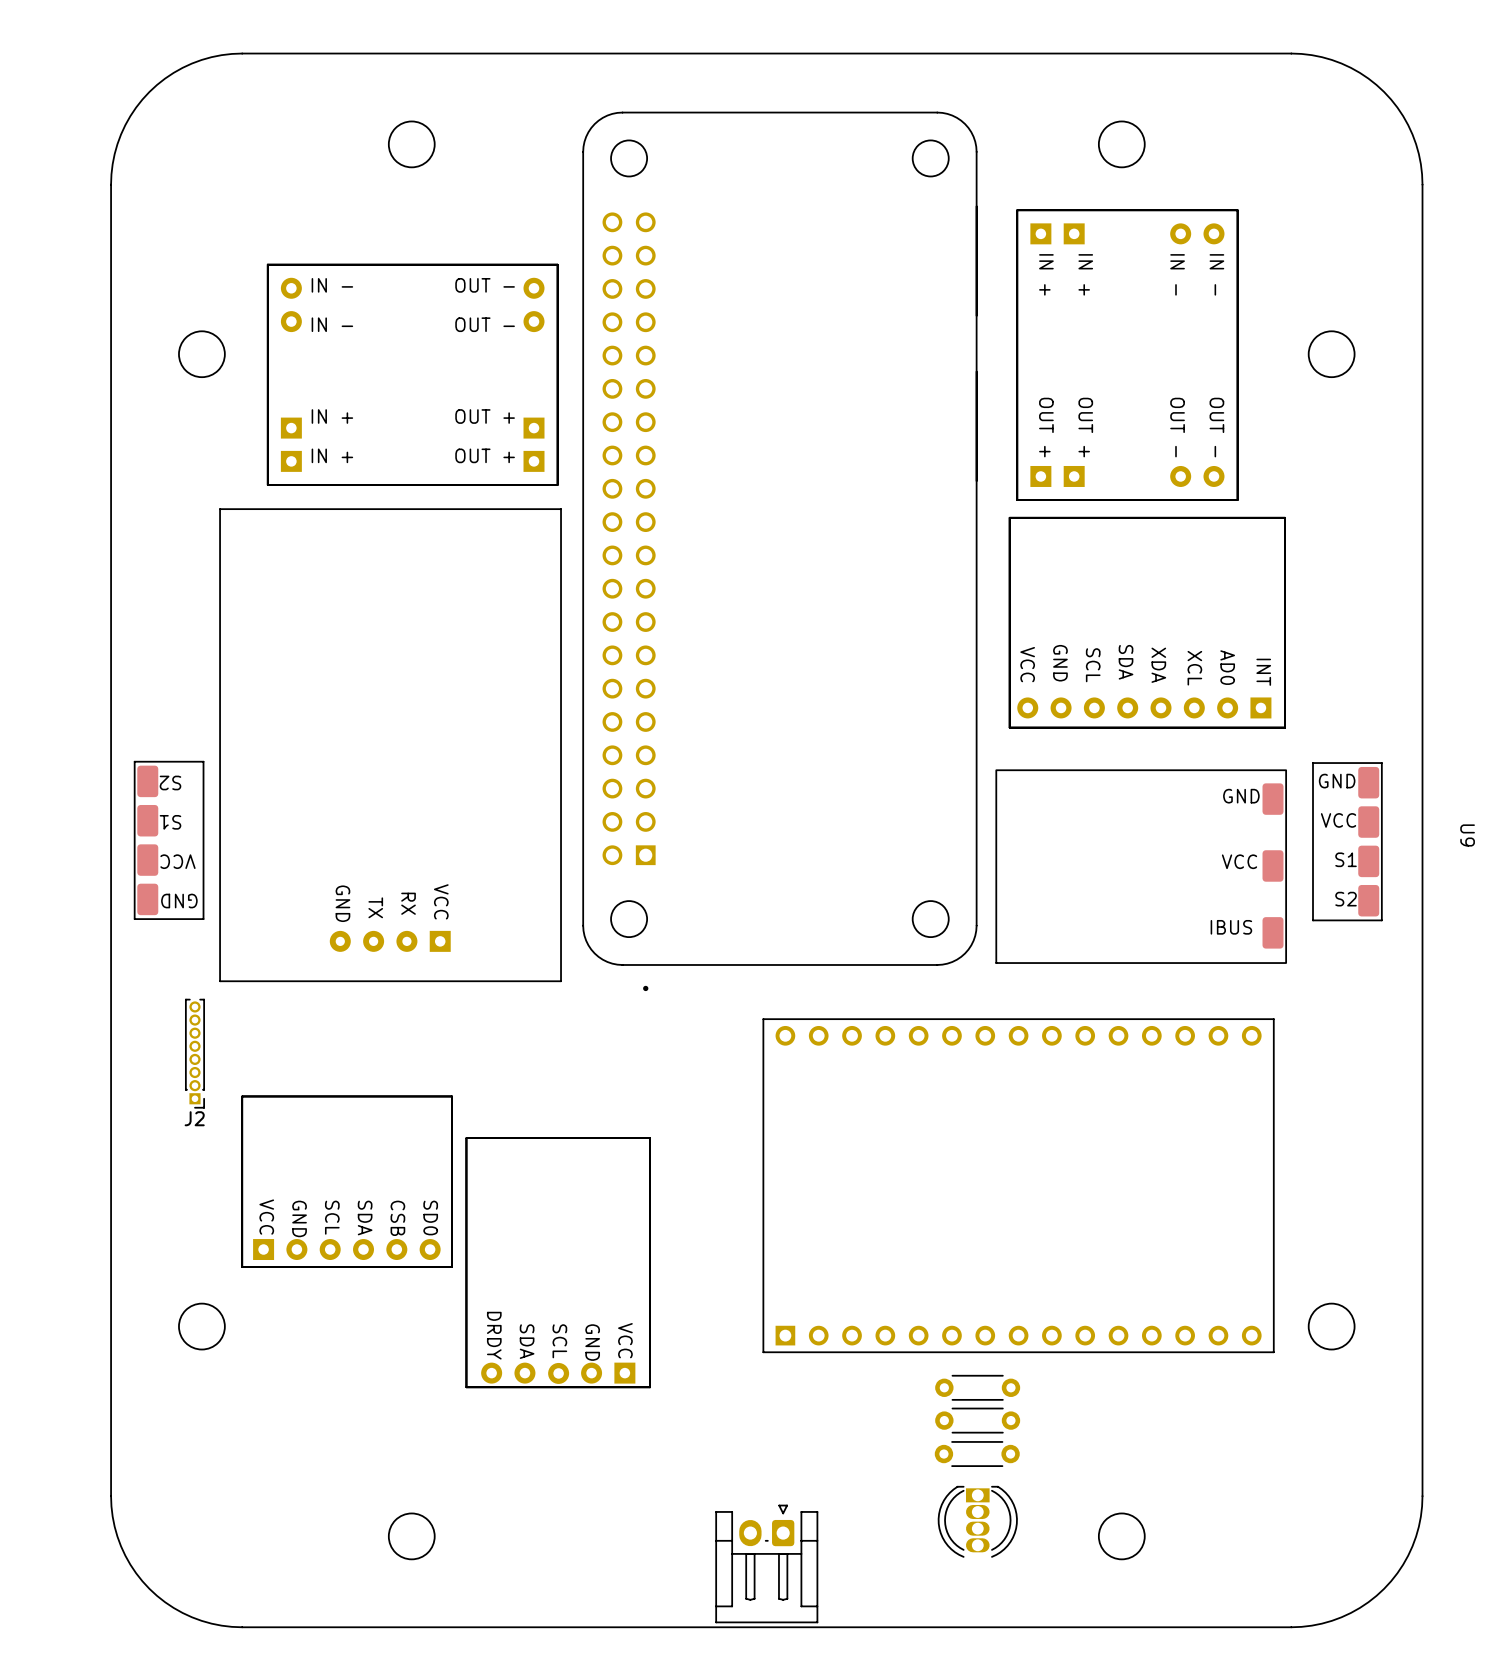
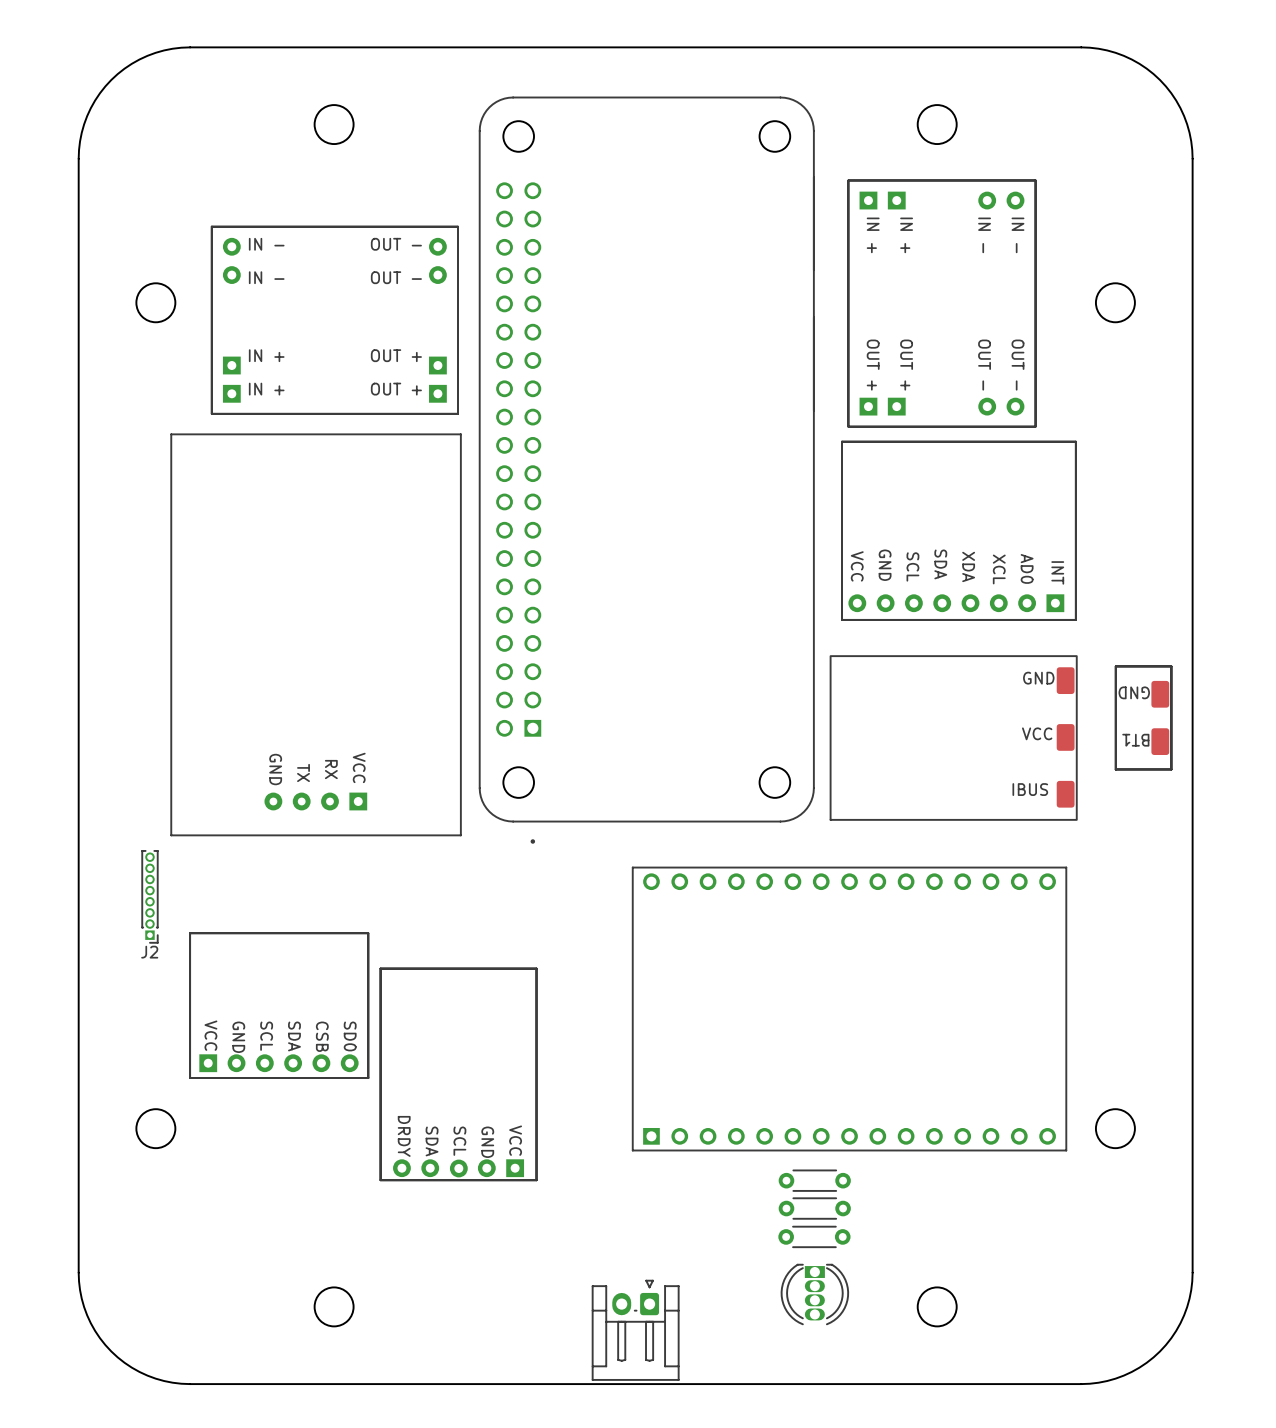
part: (169, 840) -> none
U9: (1347, 841) -> none
part: none -> (1143, 717)

